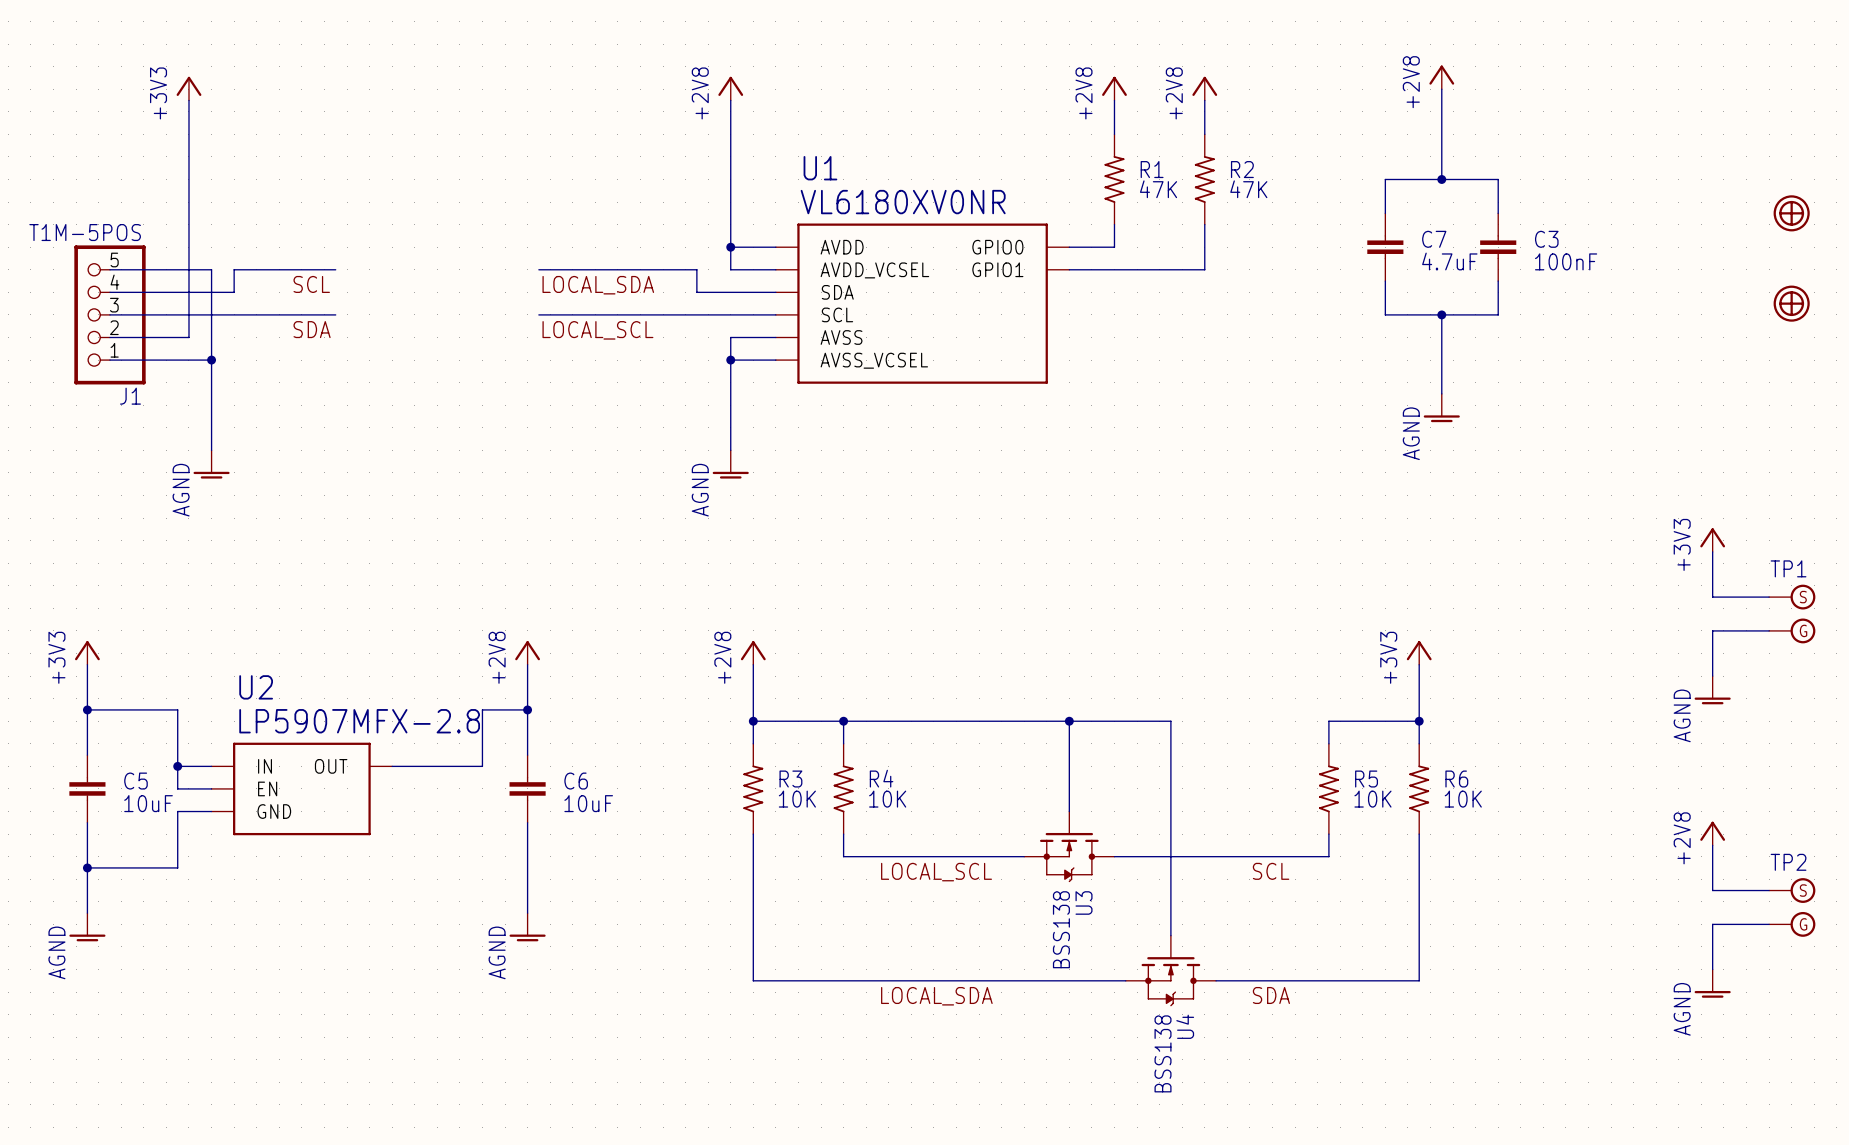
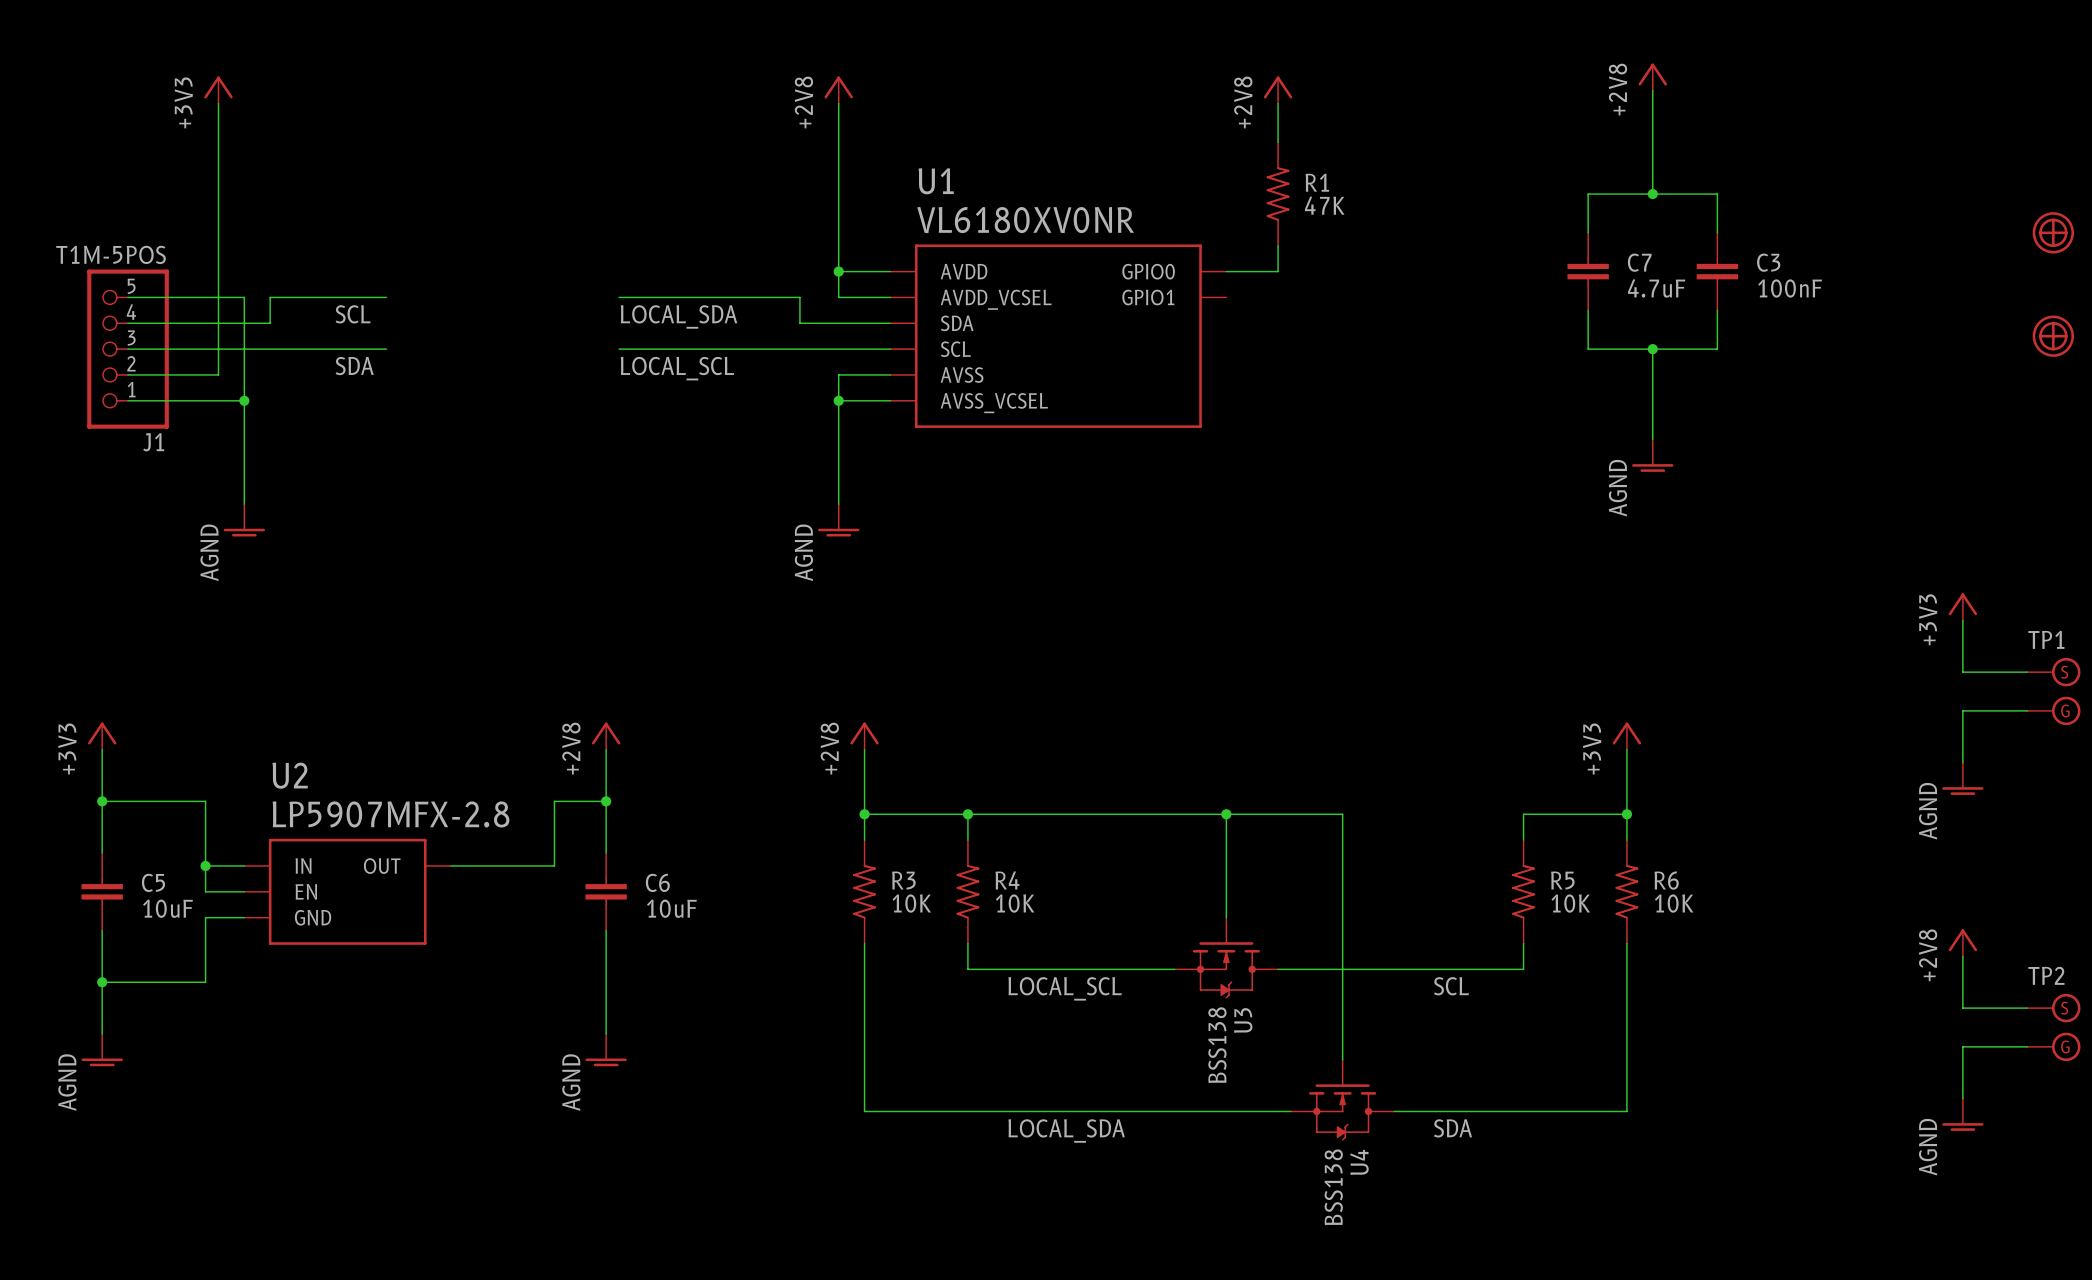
power symbol: +2V8 (1204, 88) -> none
wire: (1204, 100) (1204, 134) -> none
R2: 47K (1204, 179) -> none
wire: (1204, 224) (1204, 269) (1069, 269) -> none

